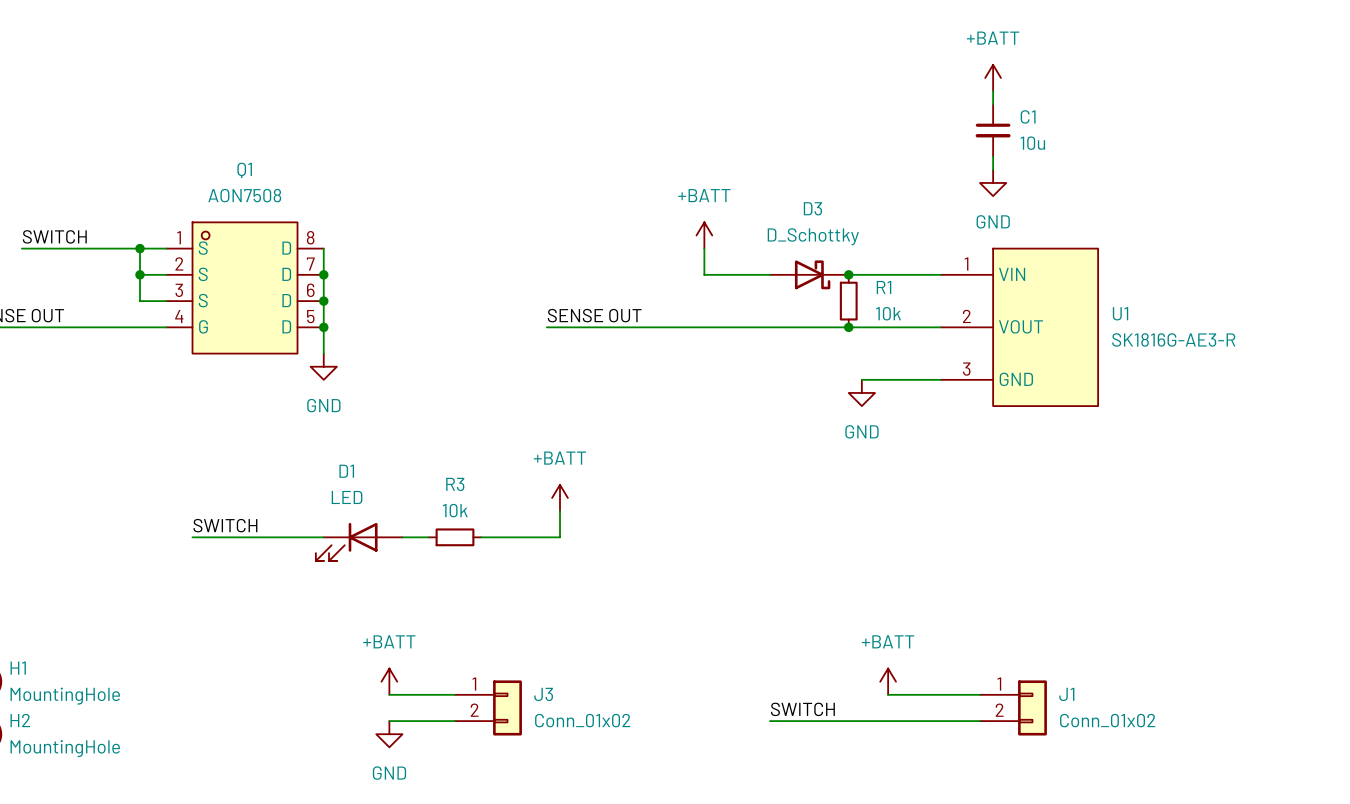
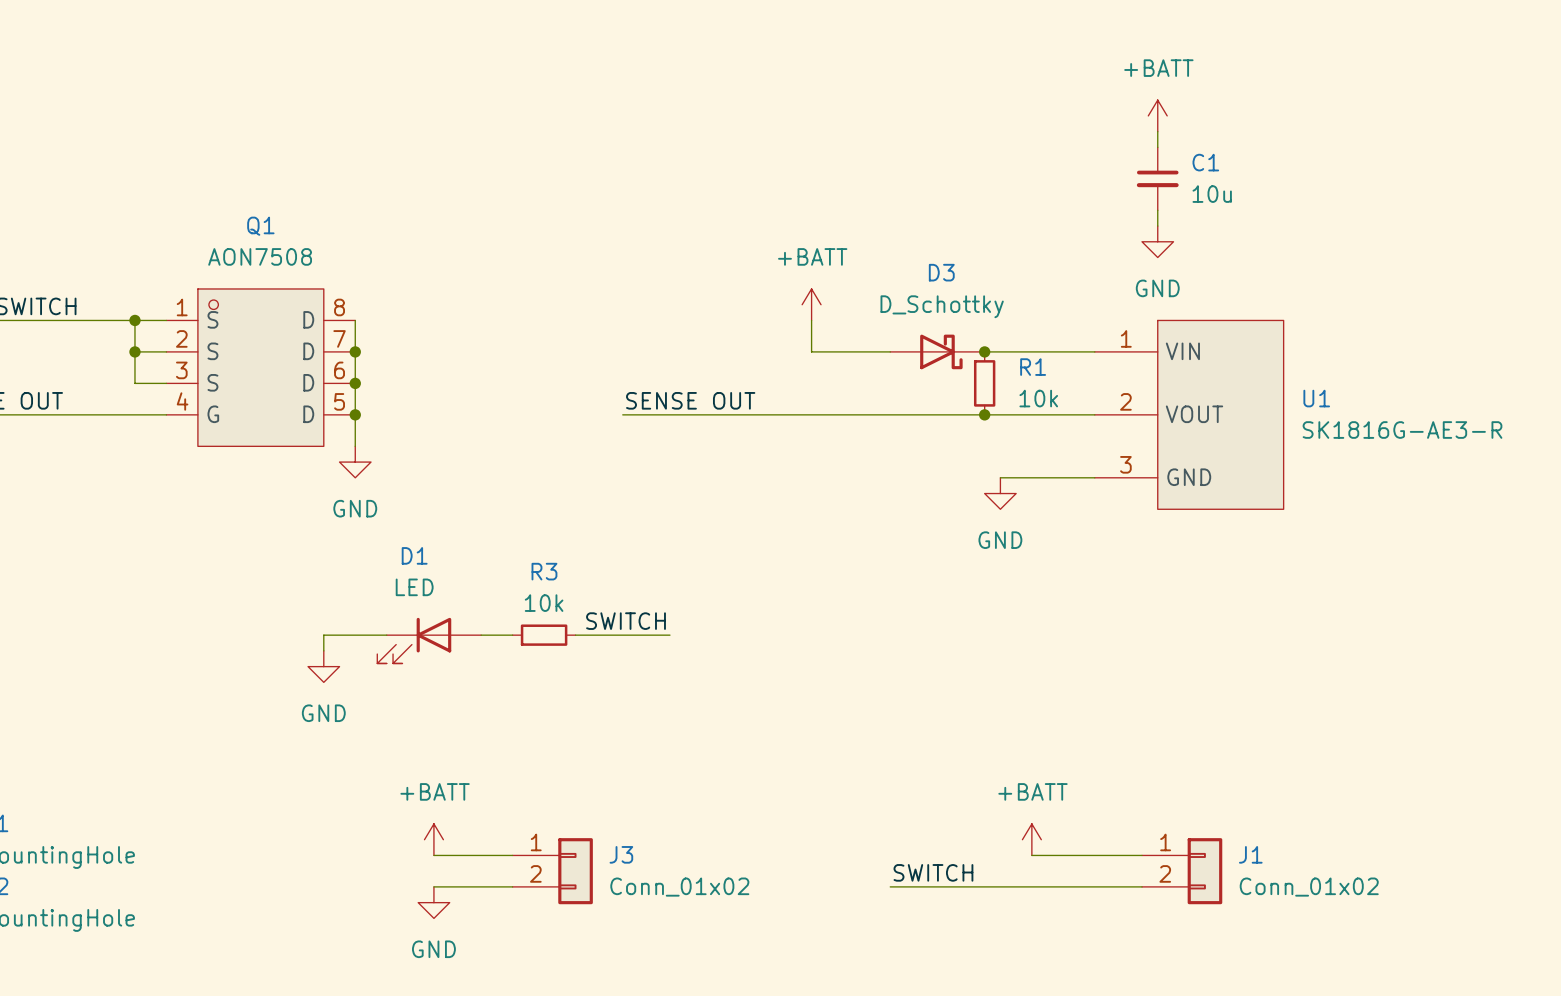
power symbol: +BATT (560, 497) -> none
label: none -> SWITCH (626, 621)
wire: none -> (386, 635) (323, 635) (323, 650)
wire: none -> (575, 635) (669, 635)
wire: (560, 511) (560, 537) (481, 537) -> none
label: SWITCH (225, 525) -> none
wire: (192, 537) (323, 537) -> none
power symbol: none -> GND (323, 666)
wire: (402, 537) (428, 537) -> (481, 635) (512, 635)
R3 position: (455, 537) -> (544, 635)
D1 position: (359, 541) -> (429, 640)

